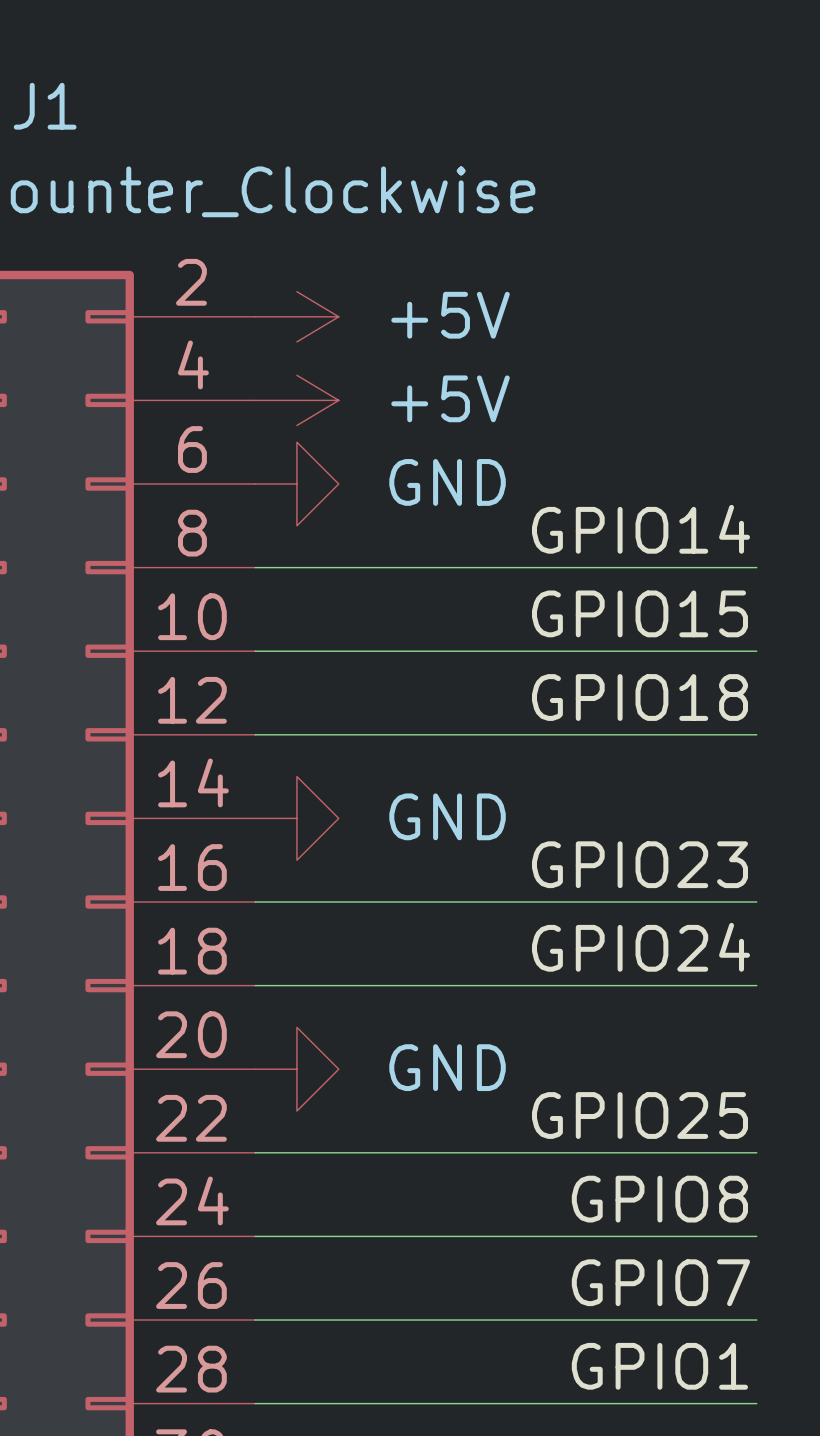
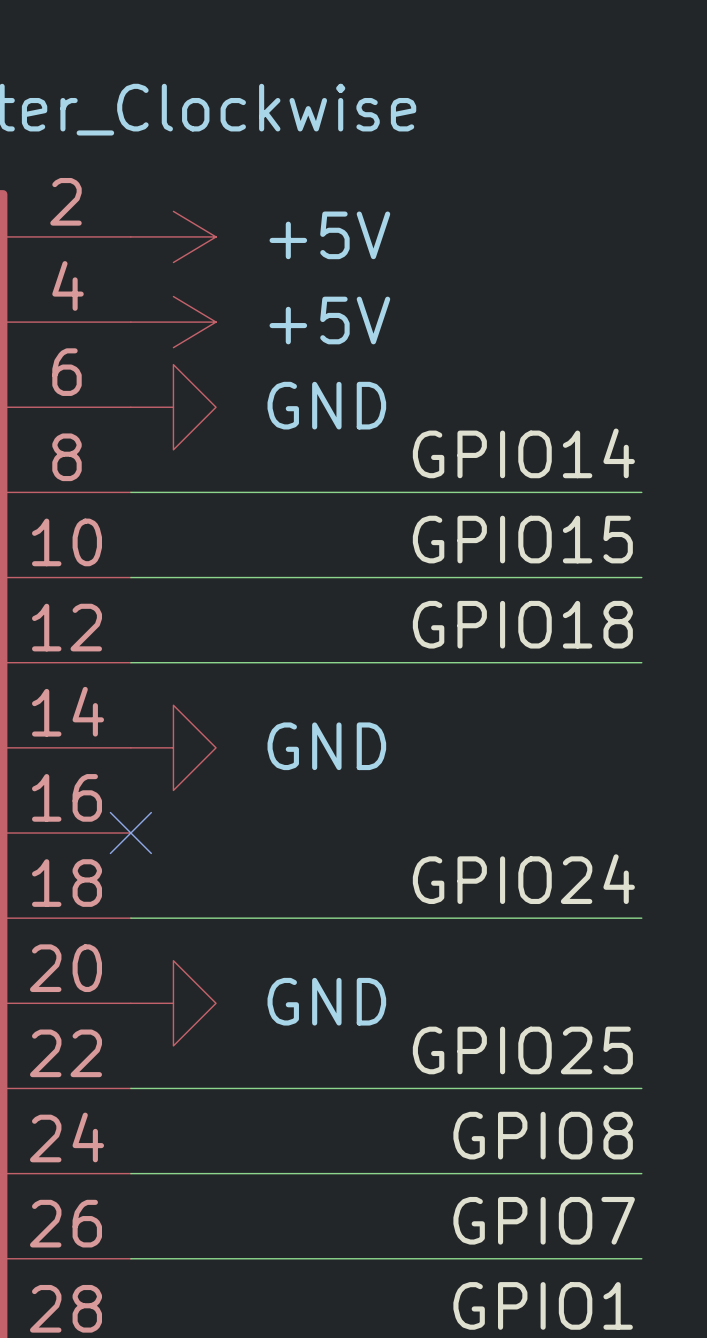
label: GPIO23 (639, 864) -> none
wire: (255, 902) (756, 902) -> none
no-connect mark: none -> (130, 833)

